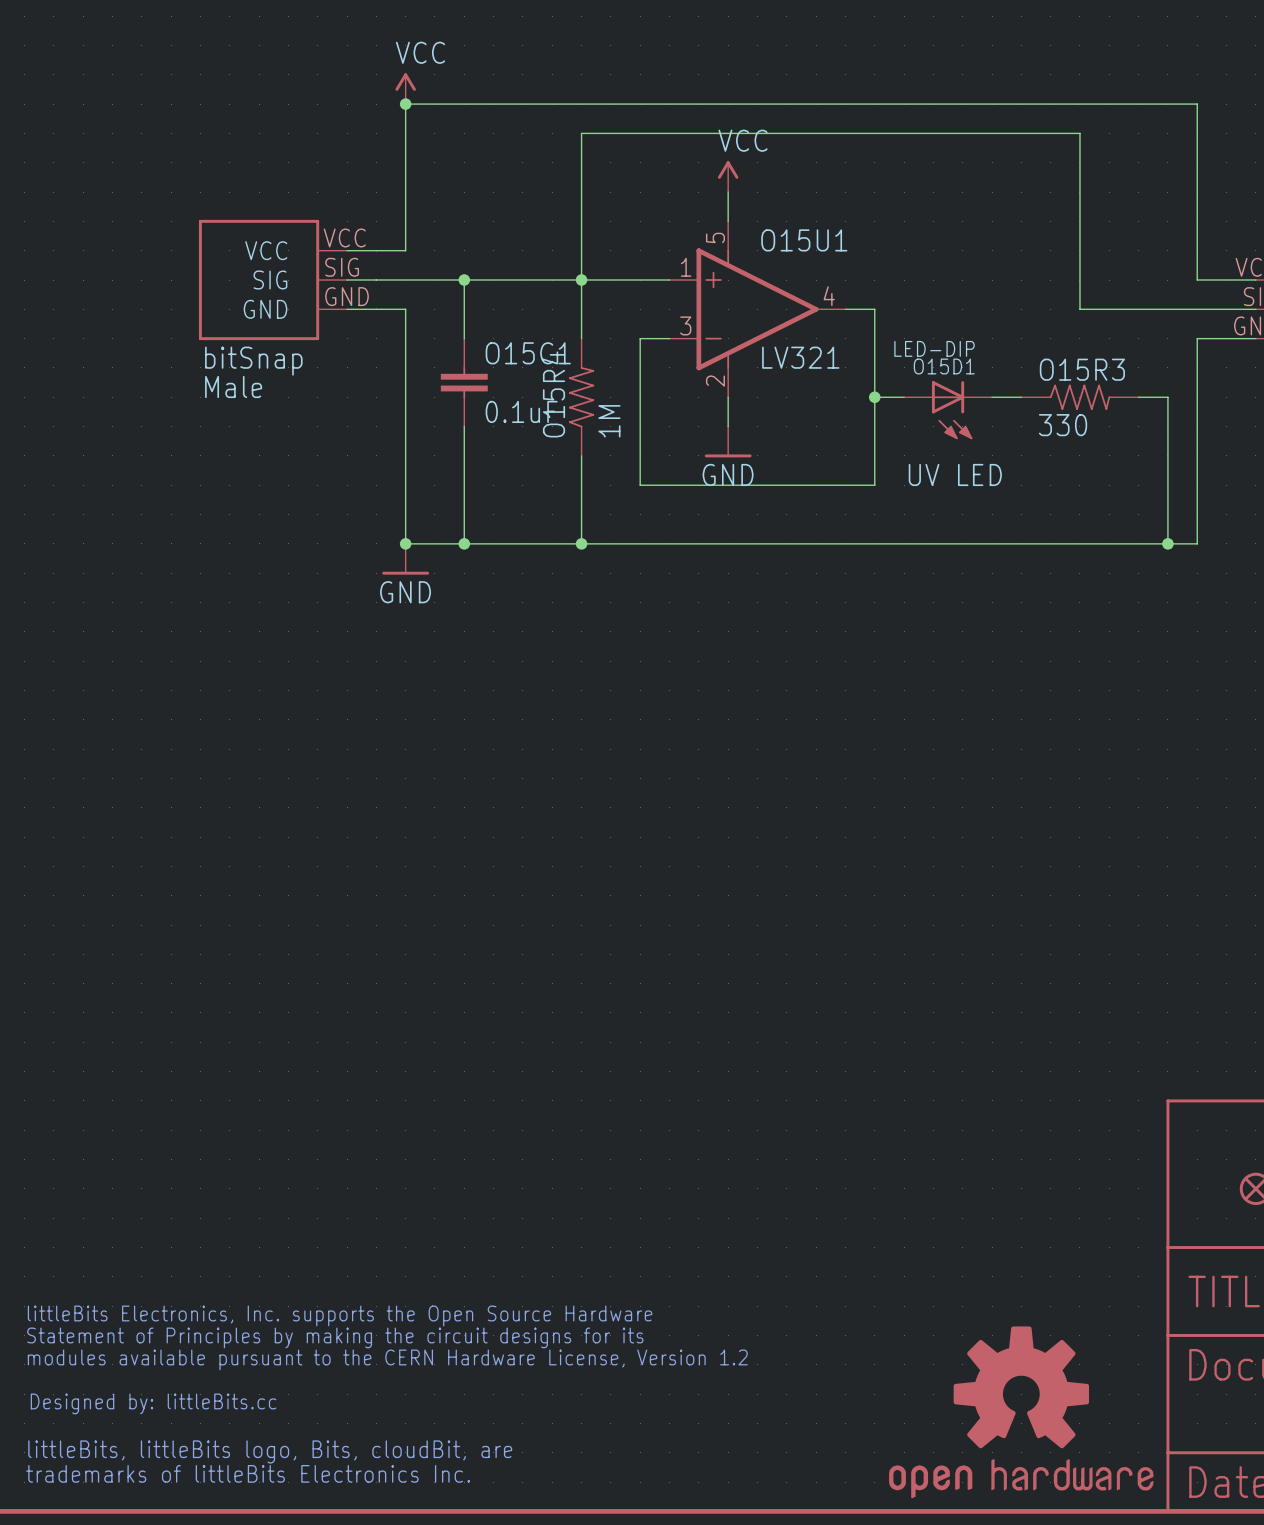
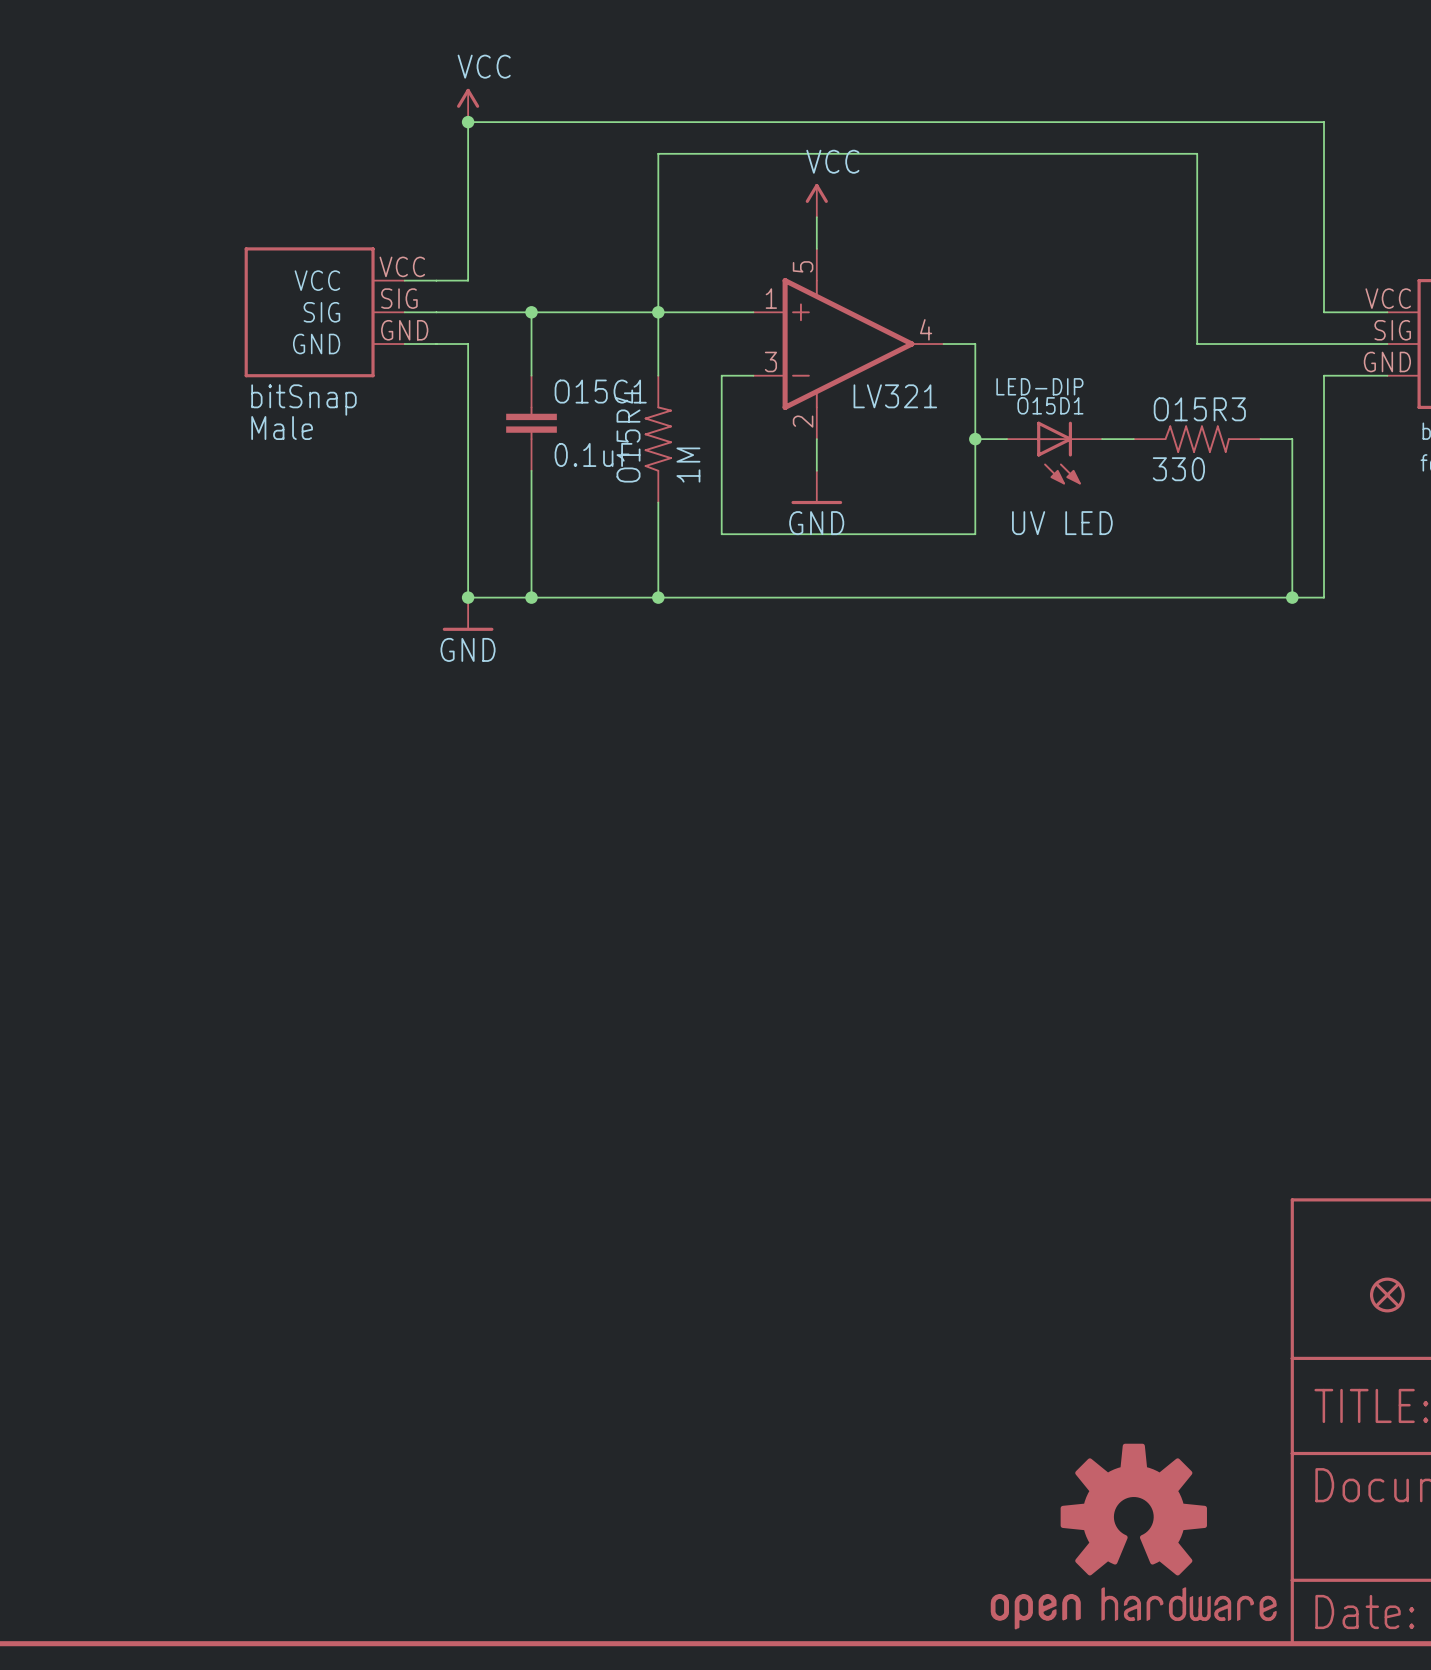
O15U1 name: O15U1 (804, 240) -> none
part: (386, 1394) -> none

